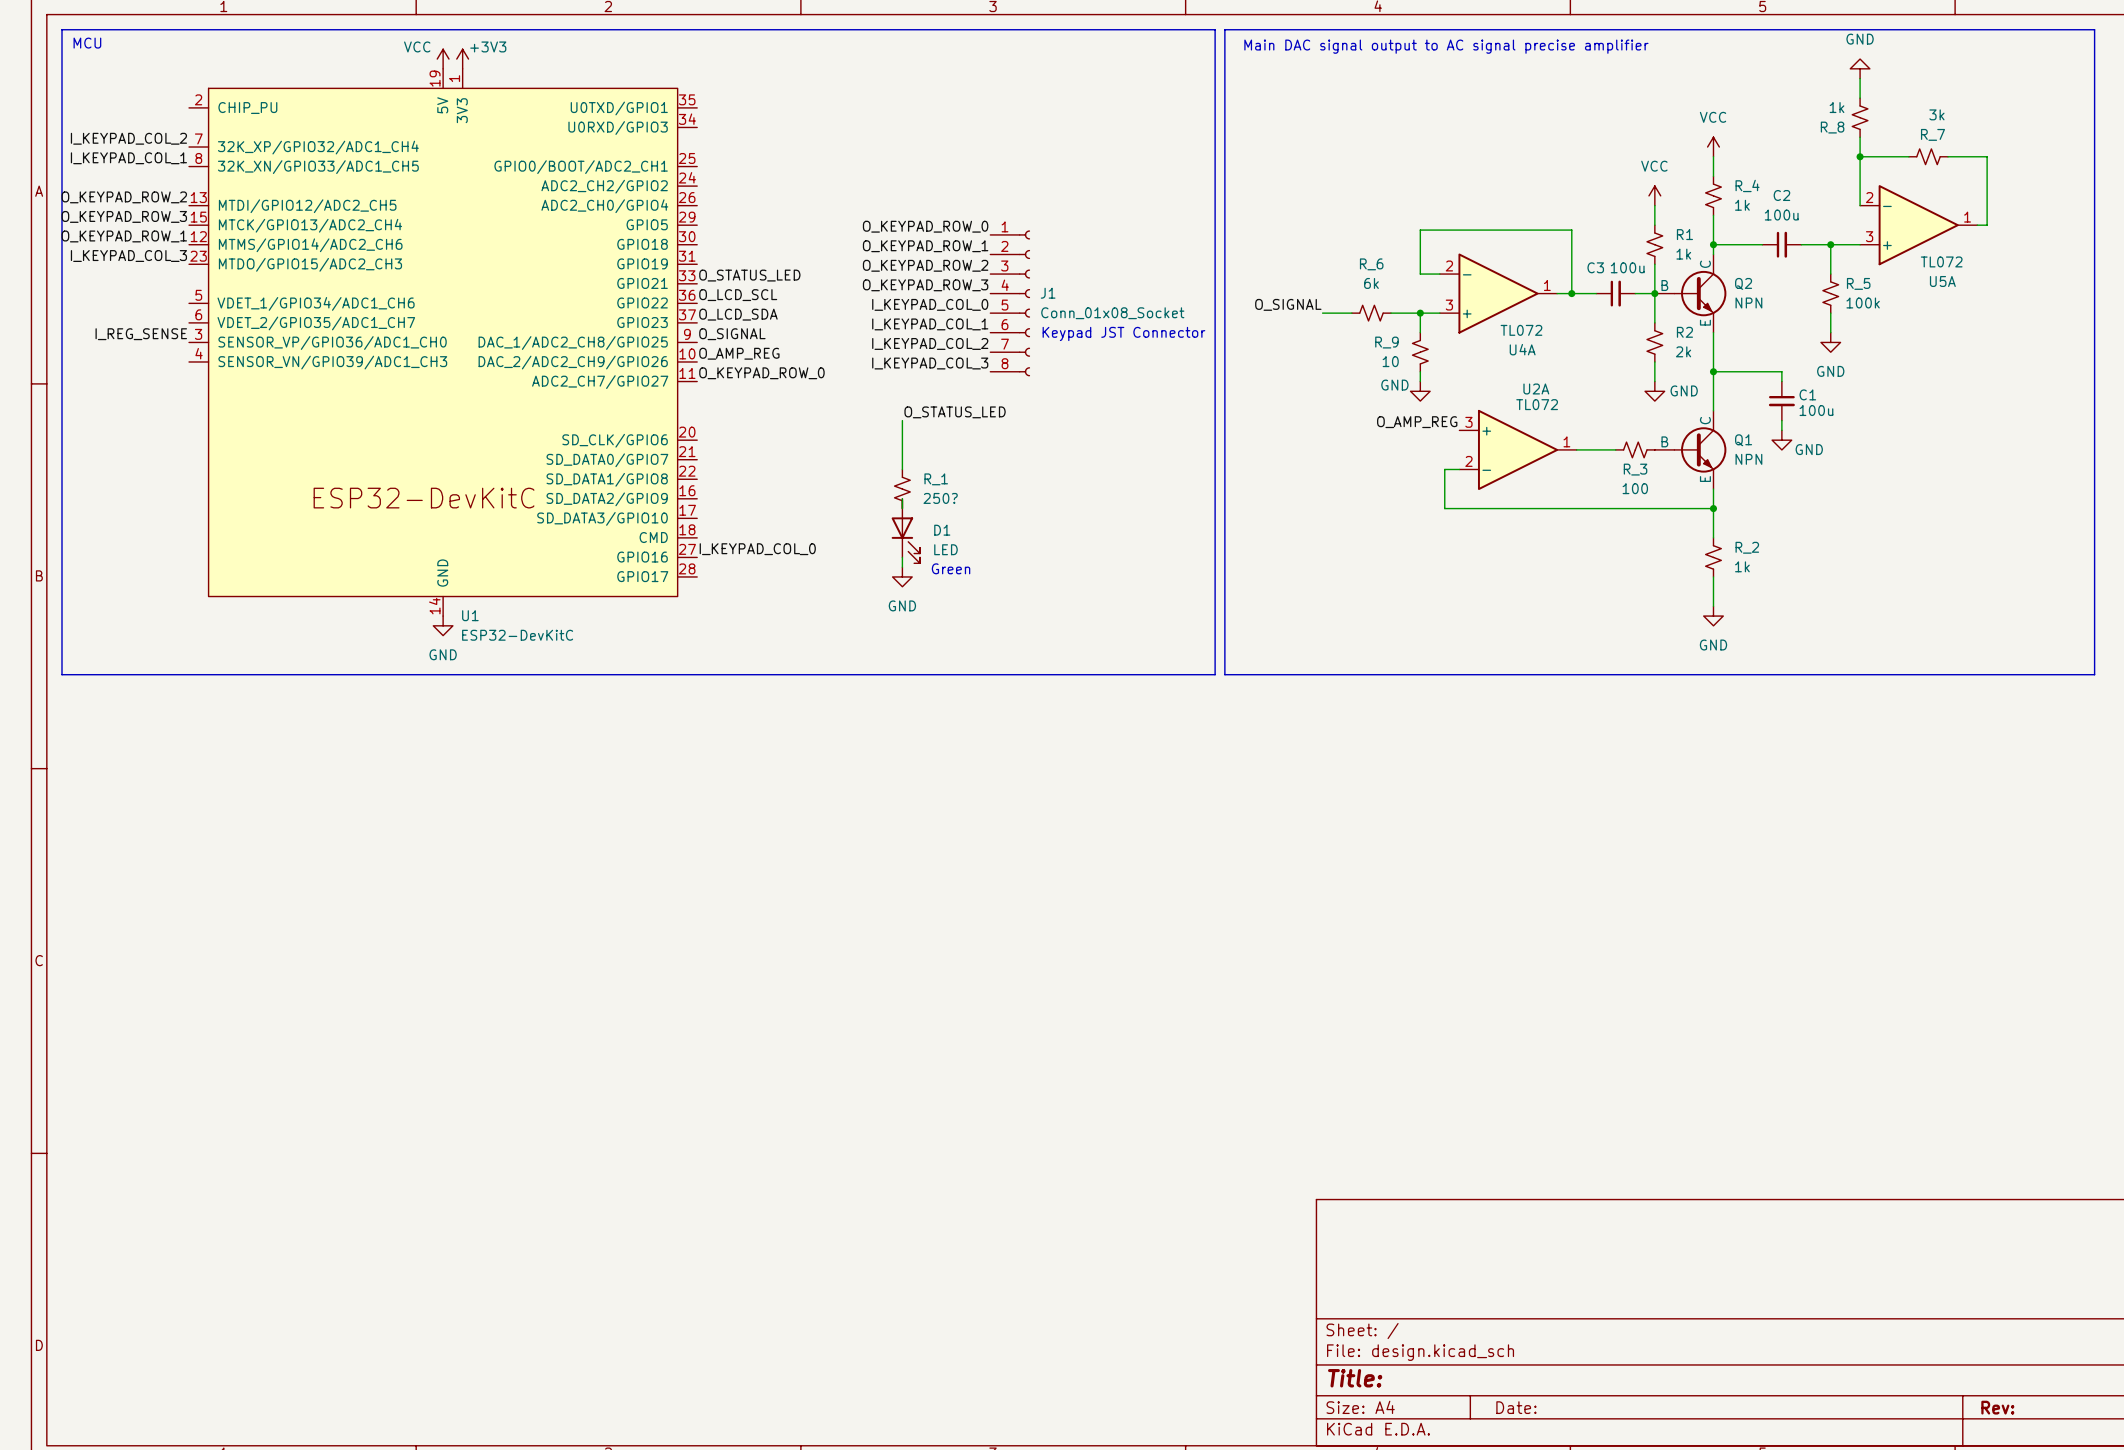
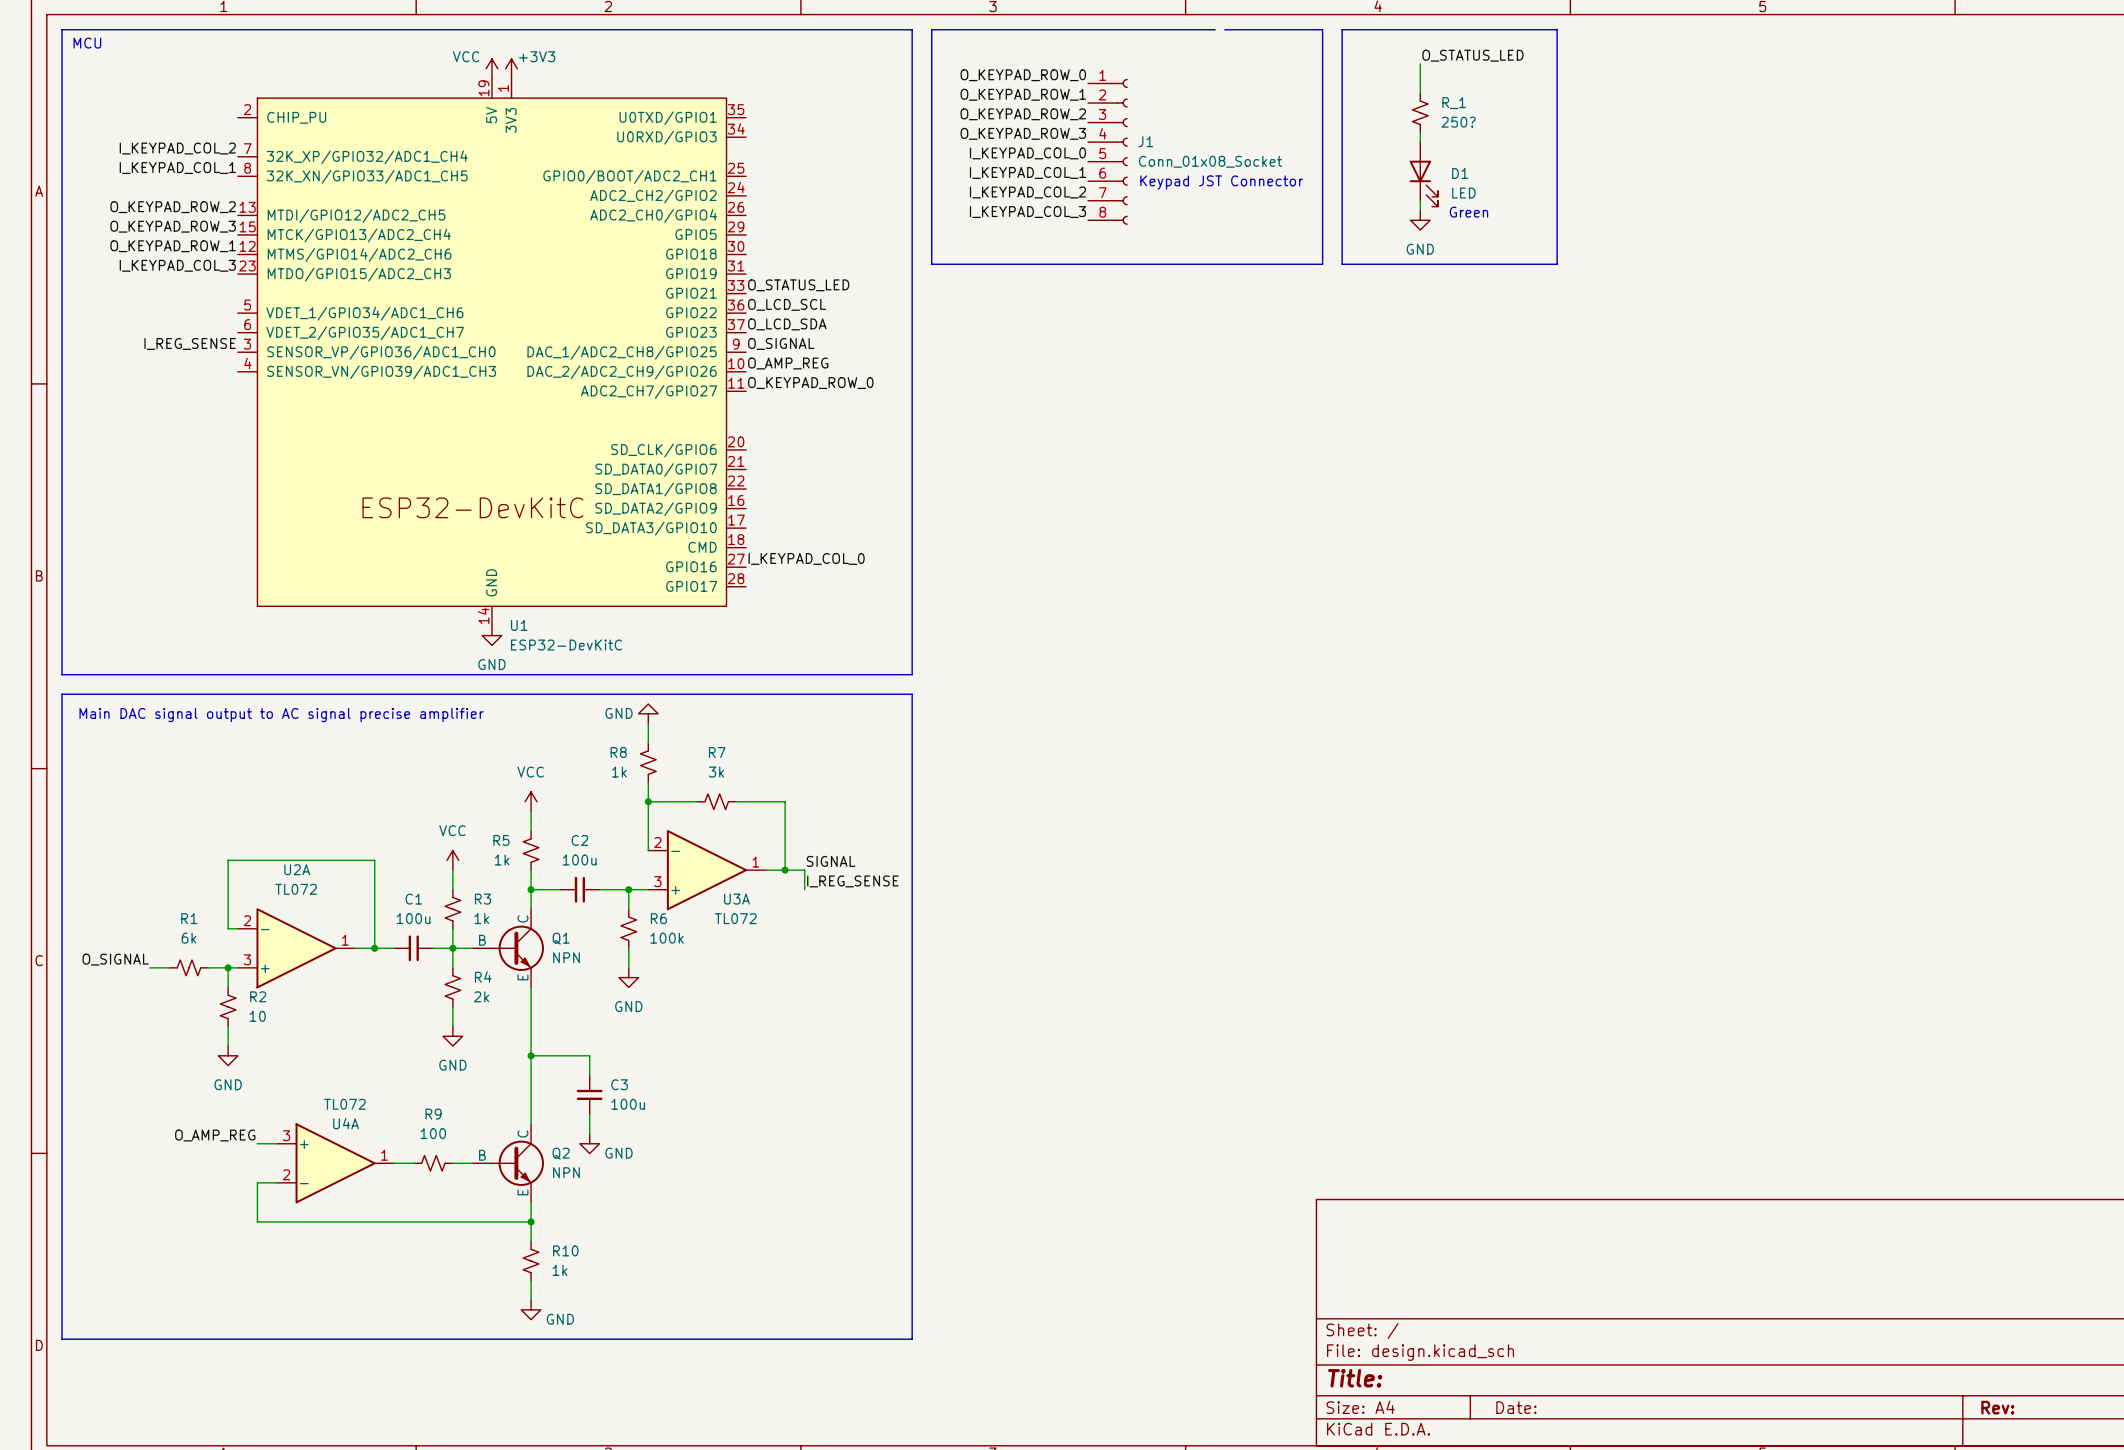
line: (912, 29) (931, 29) -> none
line: (1215, 29) (1215, 674) (912, 674) -> (912, 29) (912, 674)
line: (1224, 29) (1224, 674) (2094, 674) (2094, 29) (1557, 29) -> (1342, 29) (1342, 264) (1557, 264) (1557, 29)
line: (1322, 29) (1342, 29) -> (1322, 29) (1322, 264) (931, 264) (931, 29)
text: Main DAC signal output to AC signal precise amplifier (1446, 46) -> none
label: none -> O_STATUS_LED (1472, 55)
power symbol position: VCC (443, 59) -> VCC (491, 68)
power symbol position: +3V3 (462, 59) -> +3V3 (511, 68)
wire: none -> (1420, 63) (1420, 93)
power symbol: GND (1860, 68) -> none
label: none -> O_KEYPAD_ROW_0 (1023, 75)
wire: (1860, 78) (1860, 98) -> none
R_8: 1k (1860, 117) -> none
wire: none -> (1420, 132) (1420, 142)
wire: (1860, 137) (1860, 205) -> none
label position: I_KEYPAD_COL_2 (128, 138) -> I_KEYPAD_COL_2 (177, 148)
power symbol: VCC (1713, 147) -> none
label: none -> I_KEYPAD_COL_0 (1027, 153)
wire: (1713, 156) (1713, 176) -> none
wire: (1860, 156) (1908, 156) -> none
junction: (1860, 156) -> none
R_7: 3k (1928, 156) -> none
wire: (1948, 156) (1987, 156) (1987, 225) (1977, 225) -> none
label position: I_KEYPAD_COL_1 (128, 158) -> I_KEYPAD_COL_1 (177, 168)
power symbol: VCC (1654, 195) -> none
R_4: 1k (1713, 195) -> none
label position: O_KEYPAD_ROW_2 (124, 197) -> O_KEYPAD_ROW_2 (173, 207)
wire: (1654, 205) (1654, 225) -> none
text: none -> Green (1468, 212)
wire: (1713, 215) (1713, 254) -> none
label position: O_KEYPAD_ROW_3 (124, 216) -> O_KEYPAD_ROW_3 (173, 226)
power symbol: none -> GND (1420, 220)
U5A: TL072 (1918, 225) -> none
label: O_KEYPAD_ROW_0 (925, 226) -> none
C2 symbol: [1762, 231, 1802, 258] -> [560, 876, 600, 903]
R1 name position: R1 (1684, 234) -> R1 (189, 918)
label position: O_KEYPAD_ROW_1 (124, 236) -> O_KEYPAD_ROW_1 (173, 246)
R1 rotation: 0° (1654, 244) -> 90° clockwise (189, 967)
R1 position: (1654, 244) -> (189, 967)
wire: (1713, 244) (1762, 244) -> none
junction: (1713, 244) -> none
wire: (1801, 244) (1860, 244) -> none
wire: (1830, 244) (1830, 274) -> none
junction: (1830, 244) -> none
label position: O_KEYPAD_ROW_1 (925, 246) -> O_KEYPAD_ROW_1 (1023, 94)
R1 value: 1k (1683, 254) -> 6k (189, 938)
label position: I_KEYPAD_COL_3 (128, 256) -> I_KEYPAD_COL_3 (177, 265)
wire: (1654, 264) (1654, 322) -> none
label position: O_KEYPAD_ROW_2 (925, 265) -> O_KEYPAD_ROW_2 (1023, 114)
C3 name position: C3 (1595, 267) -> C3 (619, 1084)
C3 value position: 100u (1627, 267) -> 100u (628, 1104)
wire: (1439, 274) (1420, 274) (1420, 230) (1571, 230) (1571, 293) -> none
label position: O_STATUS_LED (749, 275) -> O_STATUS_LED (798, 285)
C3 symbol: [1596, 280, 1636, 307] -> [576, 1075, 603, 1115]
label position: O_KEYPAD_ROW_3 (925, 285) -> O_KEYPAD_ROW_3 (1023, 133)
U4A flip: as is (1498, 293) -> up-down (335, 1163)
U4A position: (1498, 293) -> (335, 1163)
wire: (1557, 293) (1596, 293) -> none
junction: (1571, 293) -> none
wire: (1635, 293) (1654, 293) -> none
junction: (1654, 293) -> none
Q2 position: (1690, 293) -> (508, 1163)
R_5: 100k (1830, 293) -> none
label position: O_LCD_SCL (738, 295) -> O_LCD_SCL (787, 304)
J1 position: (1010, 303) -> (1107, 151)
label: I_KEYPAD_COL_0 (930, 304) -> none
label: O_SIGNAL (1288, 304) -> none
wire: (1322, 313) (1351, 313) -> none
R_6: 6k (1371, 313) -> none
wire: (1391, 313) (1439, 313) -> none
wire: (1420, 313) (1420, 332) -> none
junction: (1420, 313) -> none
wire: (1830, 313) (1830, 332) -> none
label position: O_LCD_SDA (738, 314) -> O_LCD_SDA (787, 324)
label position: I_KEYPAD_COL_1 (930, 324) -> I_KEYPAD_COL_1 (1027, 172)
U4A value position: TL072 (1521, 330) -> TL072 (344, 1104)
wire: (1713, 332) (1713, 410) -> none
text position: Keypad JST Connector (1123, 333) -> Keypad JST Connector (1221, 182)
label position: I_REG_SENSE (141, 334) -> I_REG_SENSE (190, 343)
label position: O_SIGNAL (732, 334) -> O_SIGNAL (781, 343)
U1 position: (443, 342) -> (491, 352)
R2 position: (1654, 342) -> (228, 1006)
power symbol: GND (1830, 342) -> none
label position: I_KEYPAD_COL_2 (930, 343) -> I_KEYPAD_COL_2 (1027, 192)
U4A name position: U4A (1522, 349) -> U4A (346, 1123)
R2 value: 2k (1683, 351) -> 10 (257, 1016)
R_9: 10 (1420, 352) -> none
label position: O_AMP_REG (739, 353) -> O_AMP_REG (788, 363)
wire: (1654, 361) (1654, 381) -> none
label position: I_KEYPAD_COL_3 (930, 363) -> I_KEYPAD_COL_3 (1027, 212)
wire: (1420, 371) (1420, 381) -> (1420, 200) (1420, 210)
wire: (1713, 371) (1781, 371) (1781, 381) -> none
junction: (1713, 371) -> none
label position: O_KEYPAD_ROW_0 (761, 373) -> O_KEYPAD_ROW_0 (810, 383)
C1 symbol: [1768, 381, 1795, 421] -> [394, 935, 434, 962]
U2A name position: U2A (1536, 388) -> U2A (297, 869)
power symbol: GND (1420, 391) -> none
power symbol: GND (1654, 391) -> none
C1 name position: C1 (1807, 394) -> C1 (413, 899)
U2A value position: TL072 (1537, 404) -> TL072 (296, 889)
C1 value position: 100u (1816, 410) -> 100u (413, 918)
label: O_STATUS_LED (955, 412) -> none
wire: (902, 420) (902, 469) -> none
wire: (1781, 420) (1781, 430) -> none
label: O_AMP_REG (1417, 422) -> none
power symbol: GND (1781, 440) -> none
U2A flip: as is (1518, 449) -> up-down (296, 948)
U2A position: (1518, 449) -> (296, 948)
wire: (1576, 449) (1615, 449) -> none
R_3: 100 (1635, 449) -> none
Q1 position: (1690, 449) -> (508, 948)
wire: (1459, 469) (1444, 469) (1444, 508) (1713, 508) -> none
R_1 position: (902, 489) -> (1420, 112)
wire: (1713, 489) (1713, 537) -> none
wire: (902, 498) (902, 508) -> none
junction: (1713, 508) -> none
D1 position: (905, 531) -> (1423, 174)
label position: I_KEYPAD_COL_0 (757, 549) -> I_KEYPAD_COL_0 (806, 558)
wire: (902, 557) (902, 567) -> none
R_2: 1k (1713, 557) -> none
text: Green (951, 568) -> none
power symbol: GND (902, 576) -> none
wire: (1713, 576) (1713, 606) -> none
power symbol: GND (1713, 616) -> none
power symbol position: GND (443, 625) -> GND (491, 635)
line: none -> (62, 694) (912, 694) (912, 1339) (62, 1339) (62, 694)
power symbol: none -> GND (648, 713)
text: none -> Main DAC signal output to AC signal precise amplifier (281, 715)
wire: none -> (648, 723) (648, 743)
R8: none -> 1k (648, 762)
wire: none -> (648, 782) (648, 850)
power symbol: none -> VCC (531, 801)
wire: none -> (648, 801) (697, 801)
junction: none -> (648, 801)
R7: none -> 3k (716, 801)
wire: none -> (736, 801) (785, 801) (785, 870)
wire: none -> (531, 811) (531, 831)
R5: none -> 1k (531, 850)
power symbol: none -> VCC (452, 860)
label: none -> SIGNAL (831, 861)
wire: none -> (452, 870) (452, 889)
wire: none -> (531, 870) (531, 909)
U3A: none -> TL072 (706, 870)
wire: none -> (765, 870) (804, 870) (804, 889)
junction: none -> (785, 870)
label: none -> I_REG_SENSE (852, 881)
wire: none -> (531, 889) (560, 889)
junction: none -> (531, 889)
wire: none -> (599, 889) (648, 889)
wire: none -> (628, 889) (628, 909)
junction: none -> (628, 889)
R3: none -> 1k (452, 909)
wire: none -> (237, 928) (228, 928) (228, 860) (374, 860) (374, 948)
wire: none -> (452, 928) (452, 967)
R6: none -> 100k (628, 928)
wire: none -> (355, 948) (394, 948)
junction: none -> (374, 948)
wire: none -> (433, 948) (472, 948)
junction: none -> (452, 948)
wire: none -> (628, 948) (628, 967)
label: none -> O_SIGNAL (115, 959)
wire: none -> (149, 967) (169, 967)
wire: none -> (208, 967) (237, 967)
wire: none -> (228, 967) (228, 987)
junction: none -> (228, 967)
power symbol: none -> GND (628, 977)
R4: none -> 2k (452, 987)
wire: none -> (531, 987) (531, 1124)
wire: none -> (452, 1006) (452, 1026)
wire: none -> (228, 1026) (228, 1046)
power symbol: none -> GND (452, 1036)
power symbol: none -> GND (228, 1055)
wire: none -> (531, 1055) (589, 1055) (589, 1075)
junction: none -> (531, 1055)
wire: none -> (589, 1114) (589, 1133)
label: none -> O_AMP_REG (215, 1135)
wire: none -> (257, 1143) (276, 1143)
power symbol: none -> GND (589, 1143)
wire: none -> (394, 1163) (413, 1163)
R9: none -> 100 (433, 1163)
wire: none -> (452, 1163) (472, 1163)
wire: none -> (276, 1182) (257, 1182) (257, 1221) (531, 1221)
wire: none -> (531, 1202) (531, 1241)
junction: none -> (531, 1221)
R10: none -> 1k (531, 1261)
wire: none -> (531, 1280) (531, 1300)
power symbol: none -> GND (531, 1309)

